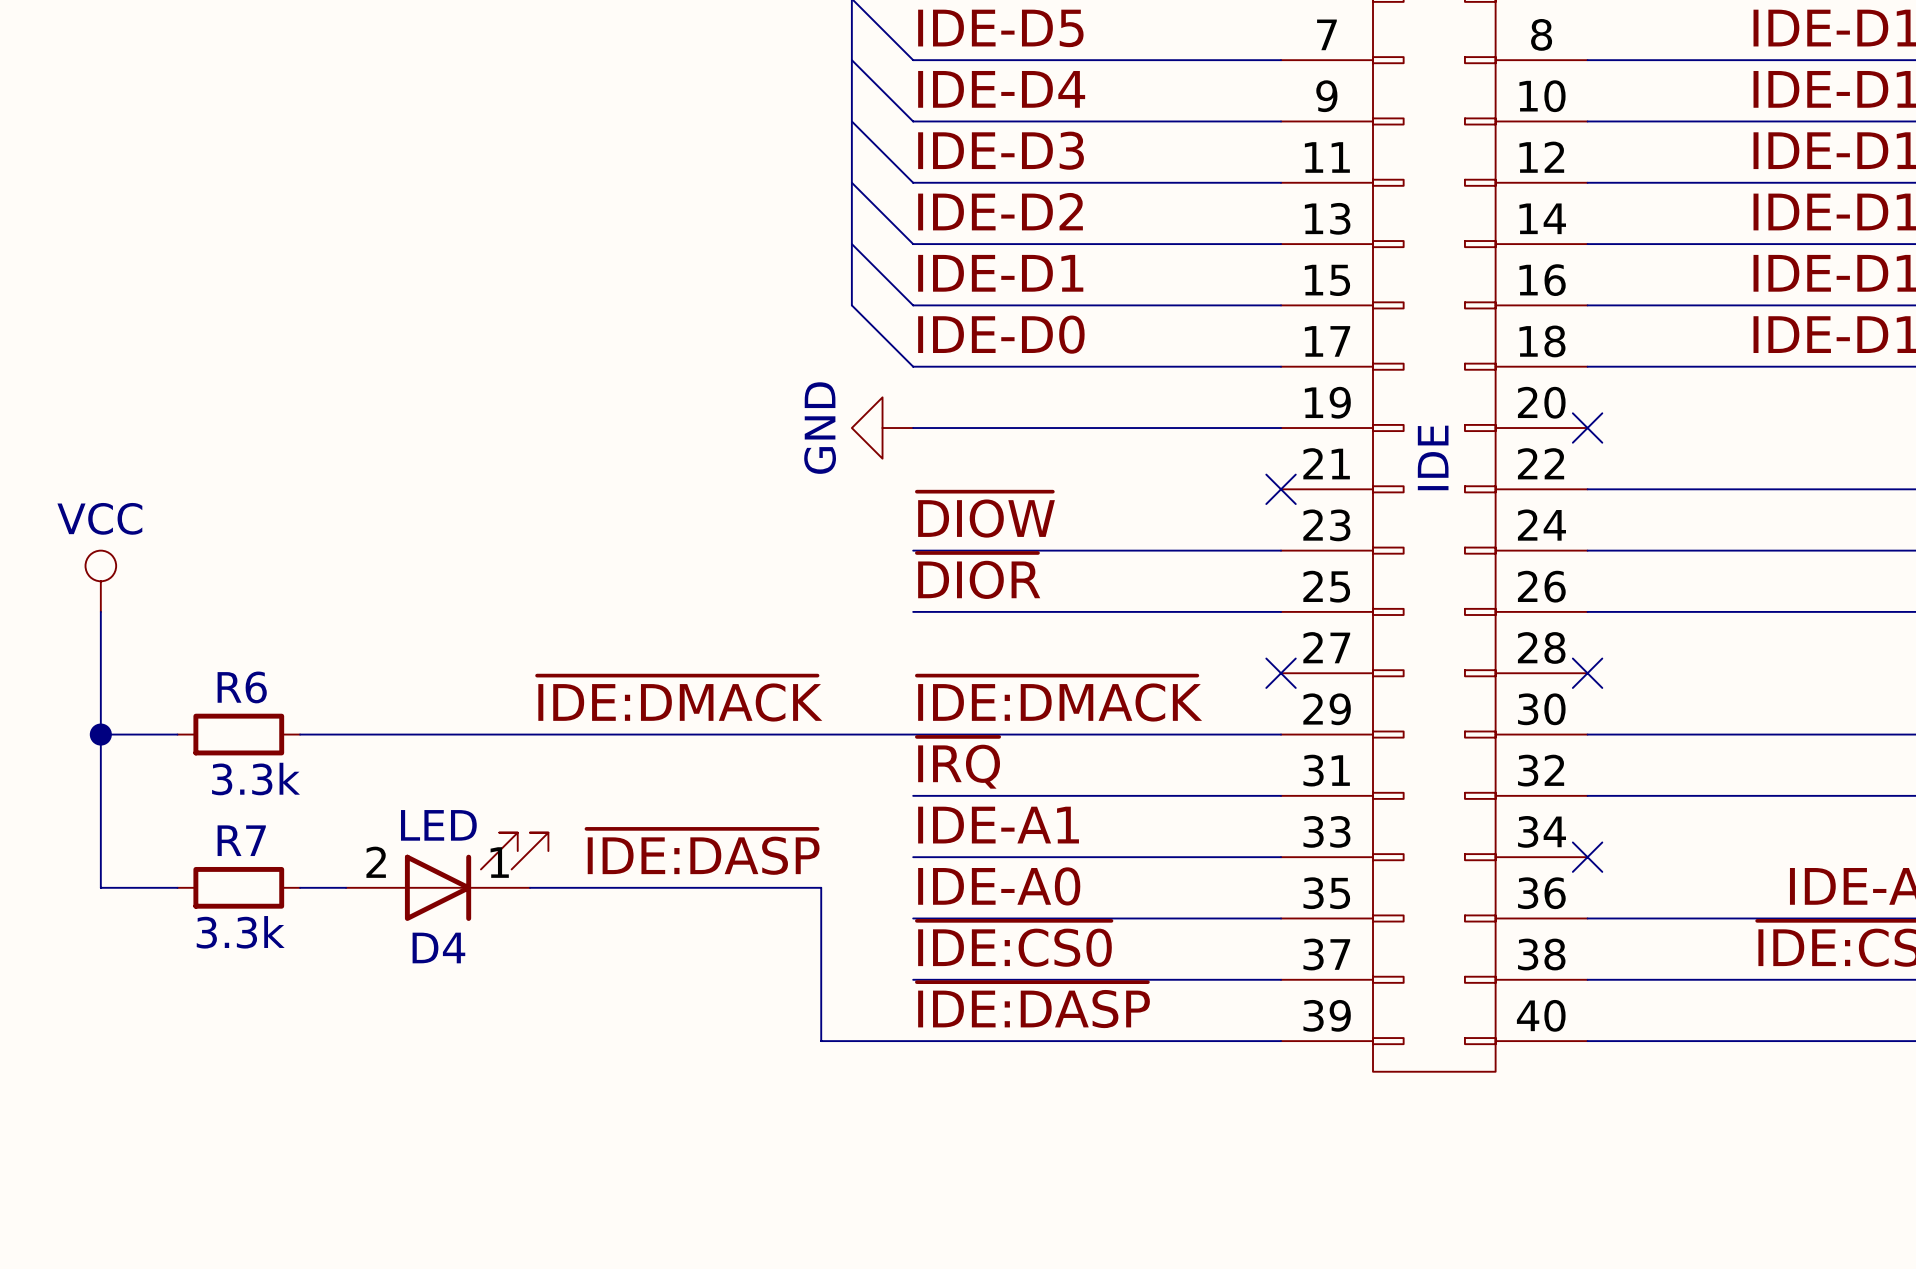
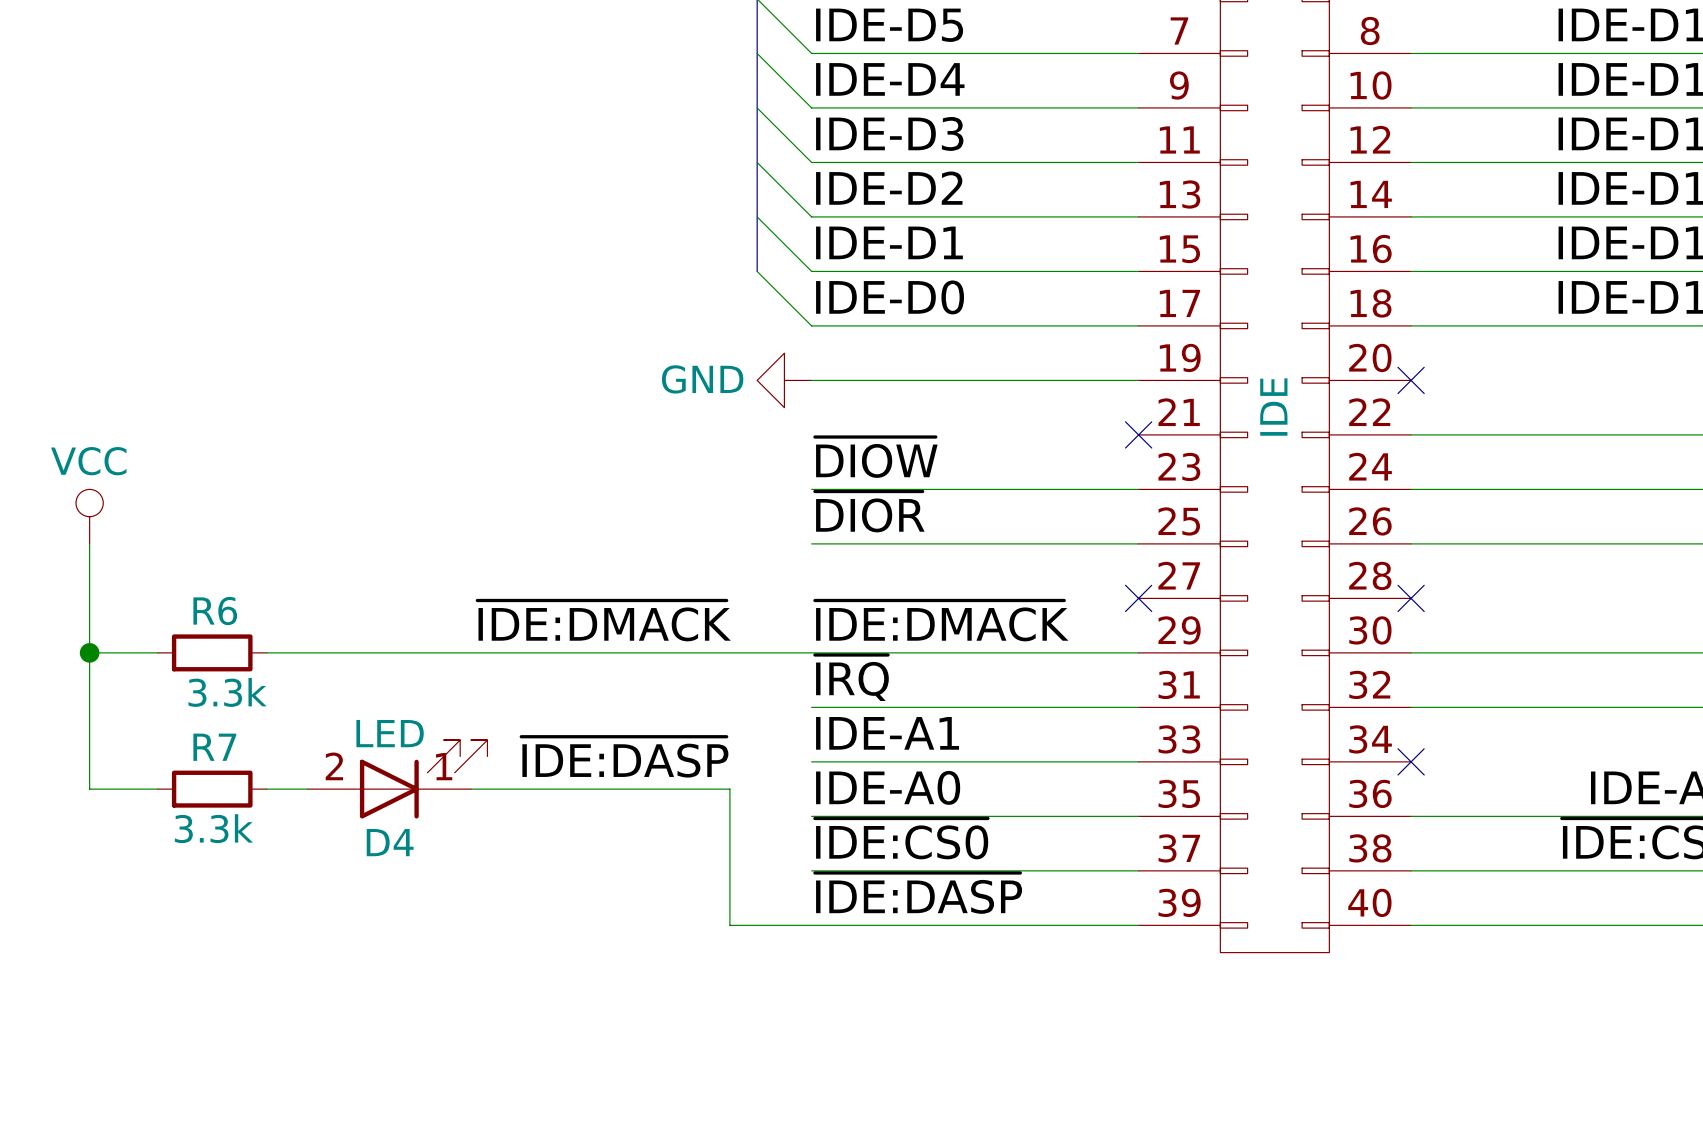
power symbol text rotation: 0° (820, 428) -> 90° clockwise (702, 379)

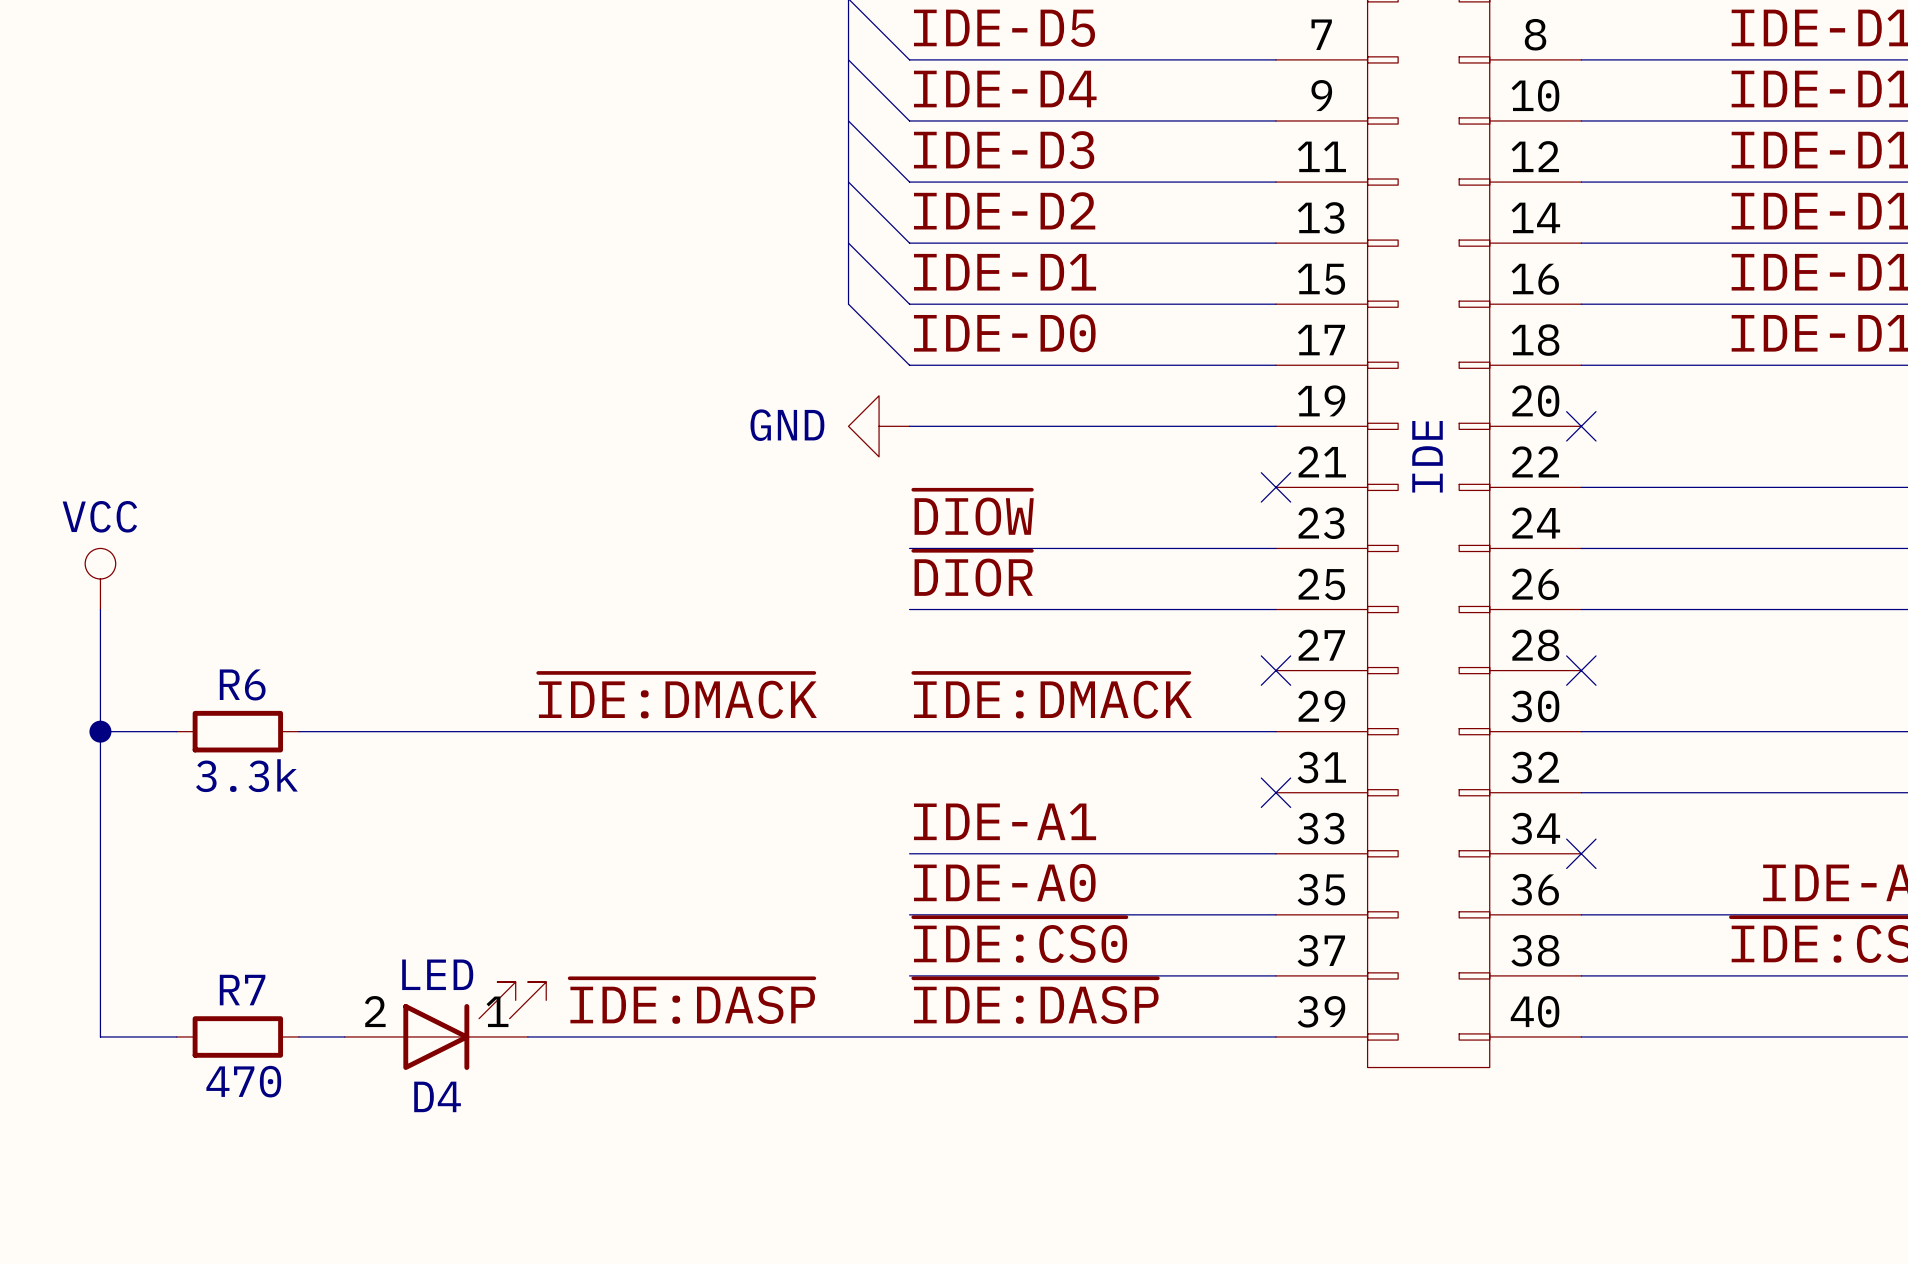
label: ~{IRQ} (851, 677) -> none
wire: (811, 707) (1138, 707) -> none
no-connect mark: none -> (1275, 792)
label position: ~{IDE:DASP} (624, 757) -> ~{IDE:DASP} (692, 1001)
D4 position: (397, 779) -> (445, 1026)
wire: (89, 789) (157, 789) -> (100, 884) (100, 1036) (176, 1036)
R7 position: (212, 789) -> (237, 1036)
wire: (266, 789) (307, 789) -> (298, 1036) (344, 1036)
wire: (471, 789) (729, 789) (729, 925) -> (527, 1036) (817, 1036)
R7 value: 3.3k (213, 828) -> 470 (243, 1081)

